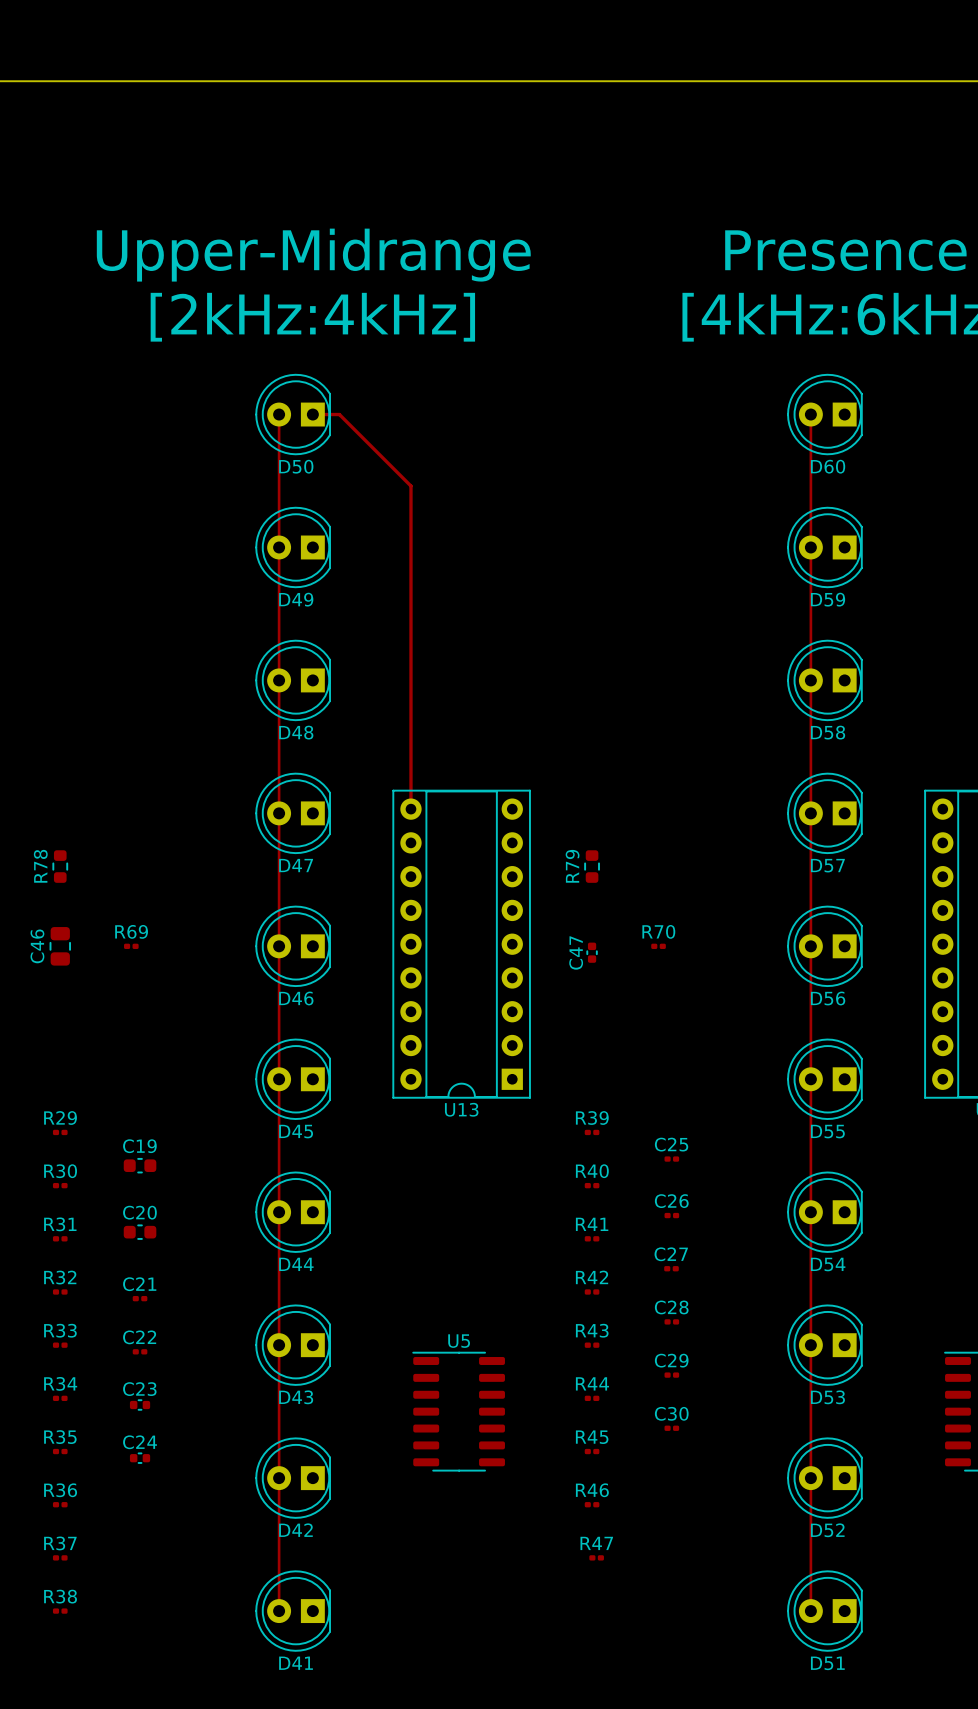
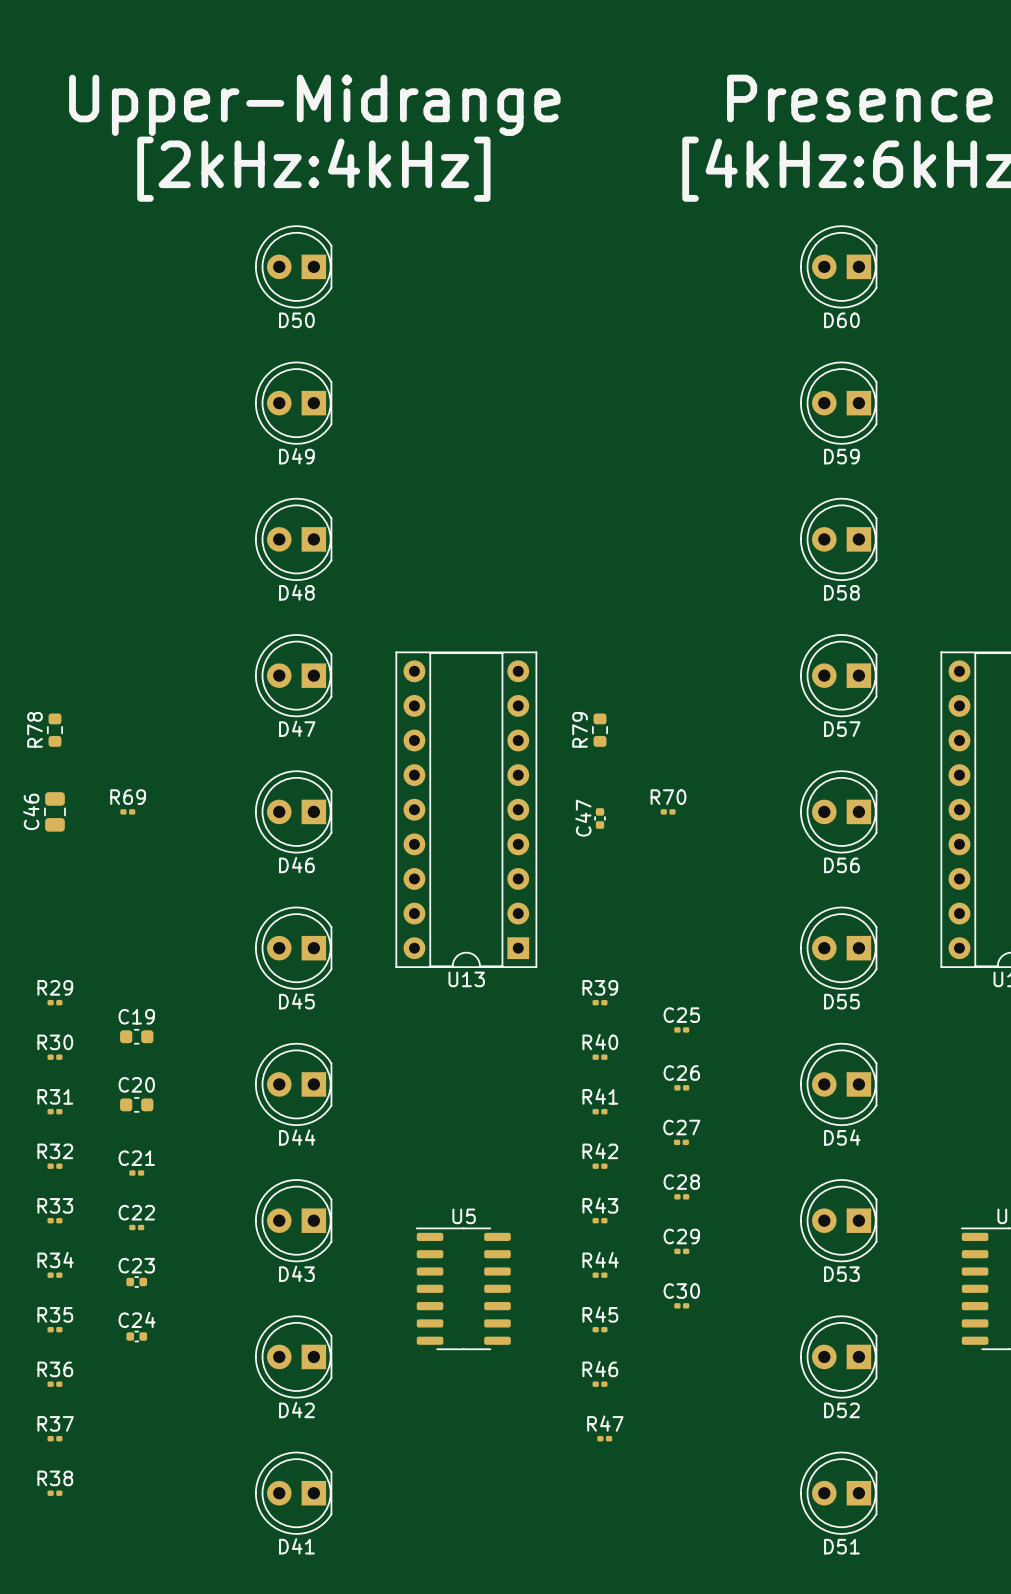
track: (279, 414) (279, 1611) -> none
track: (312, 414) (339, 414) (410, 486) (410, 809) -> none
track: (810, 414) (810, 1611) -> none

